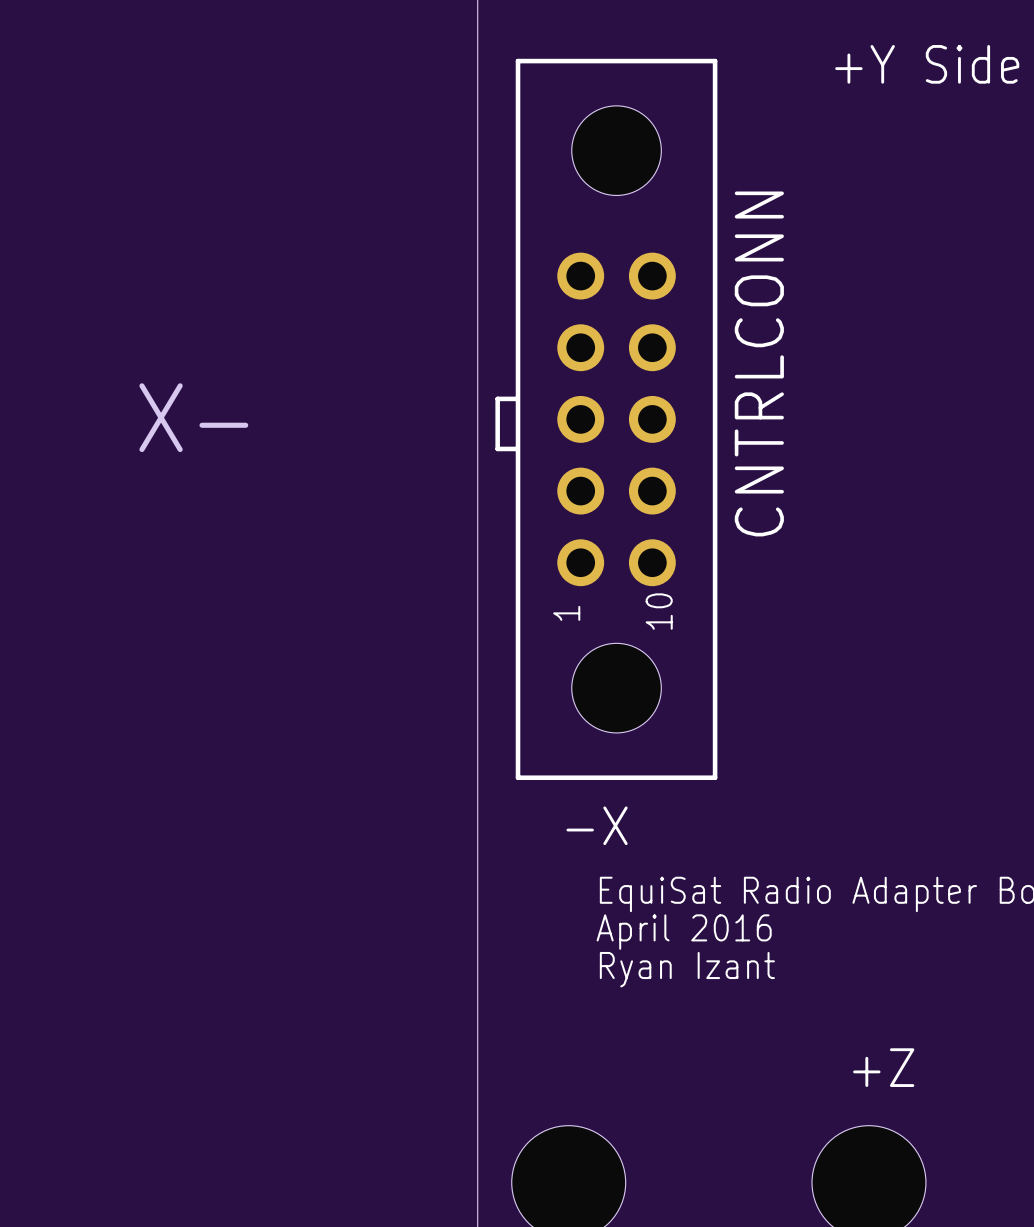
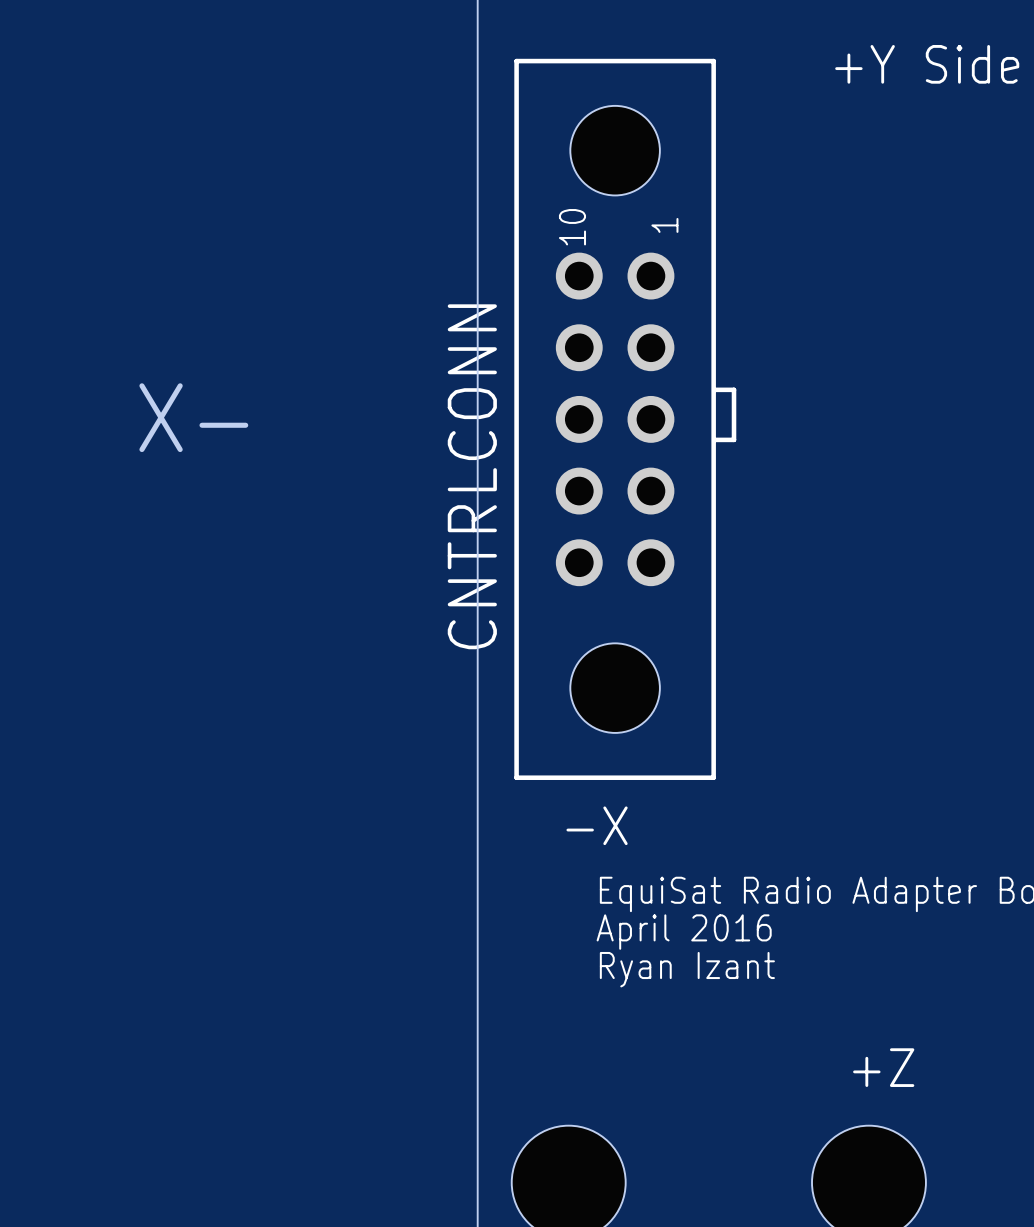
CNTRLCONN footprint: [495, 58, 718, 780] -> [514, 58, 737, 780]
CNTRLCONN name position: CNTRLCONN (759, 363) -> CNTRLCONN (472, 476)

